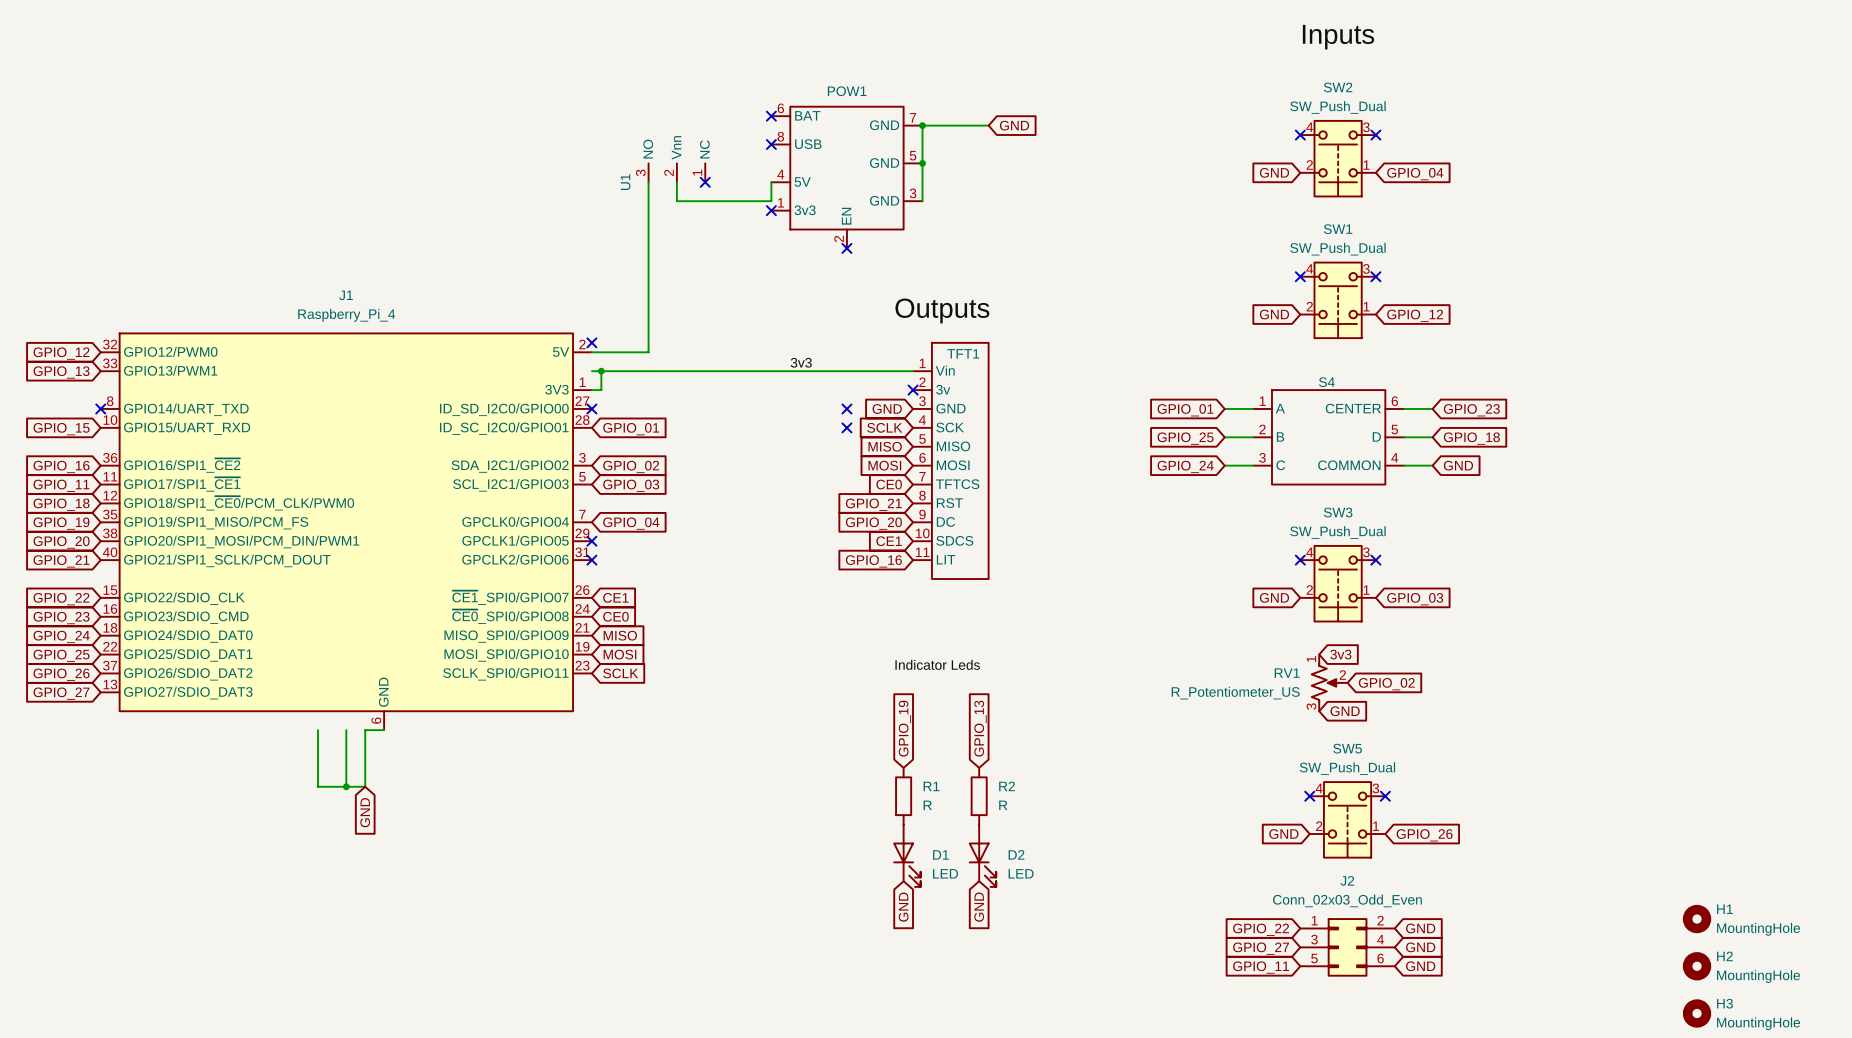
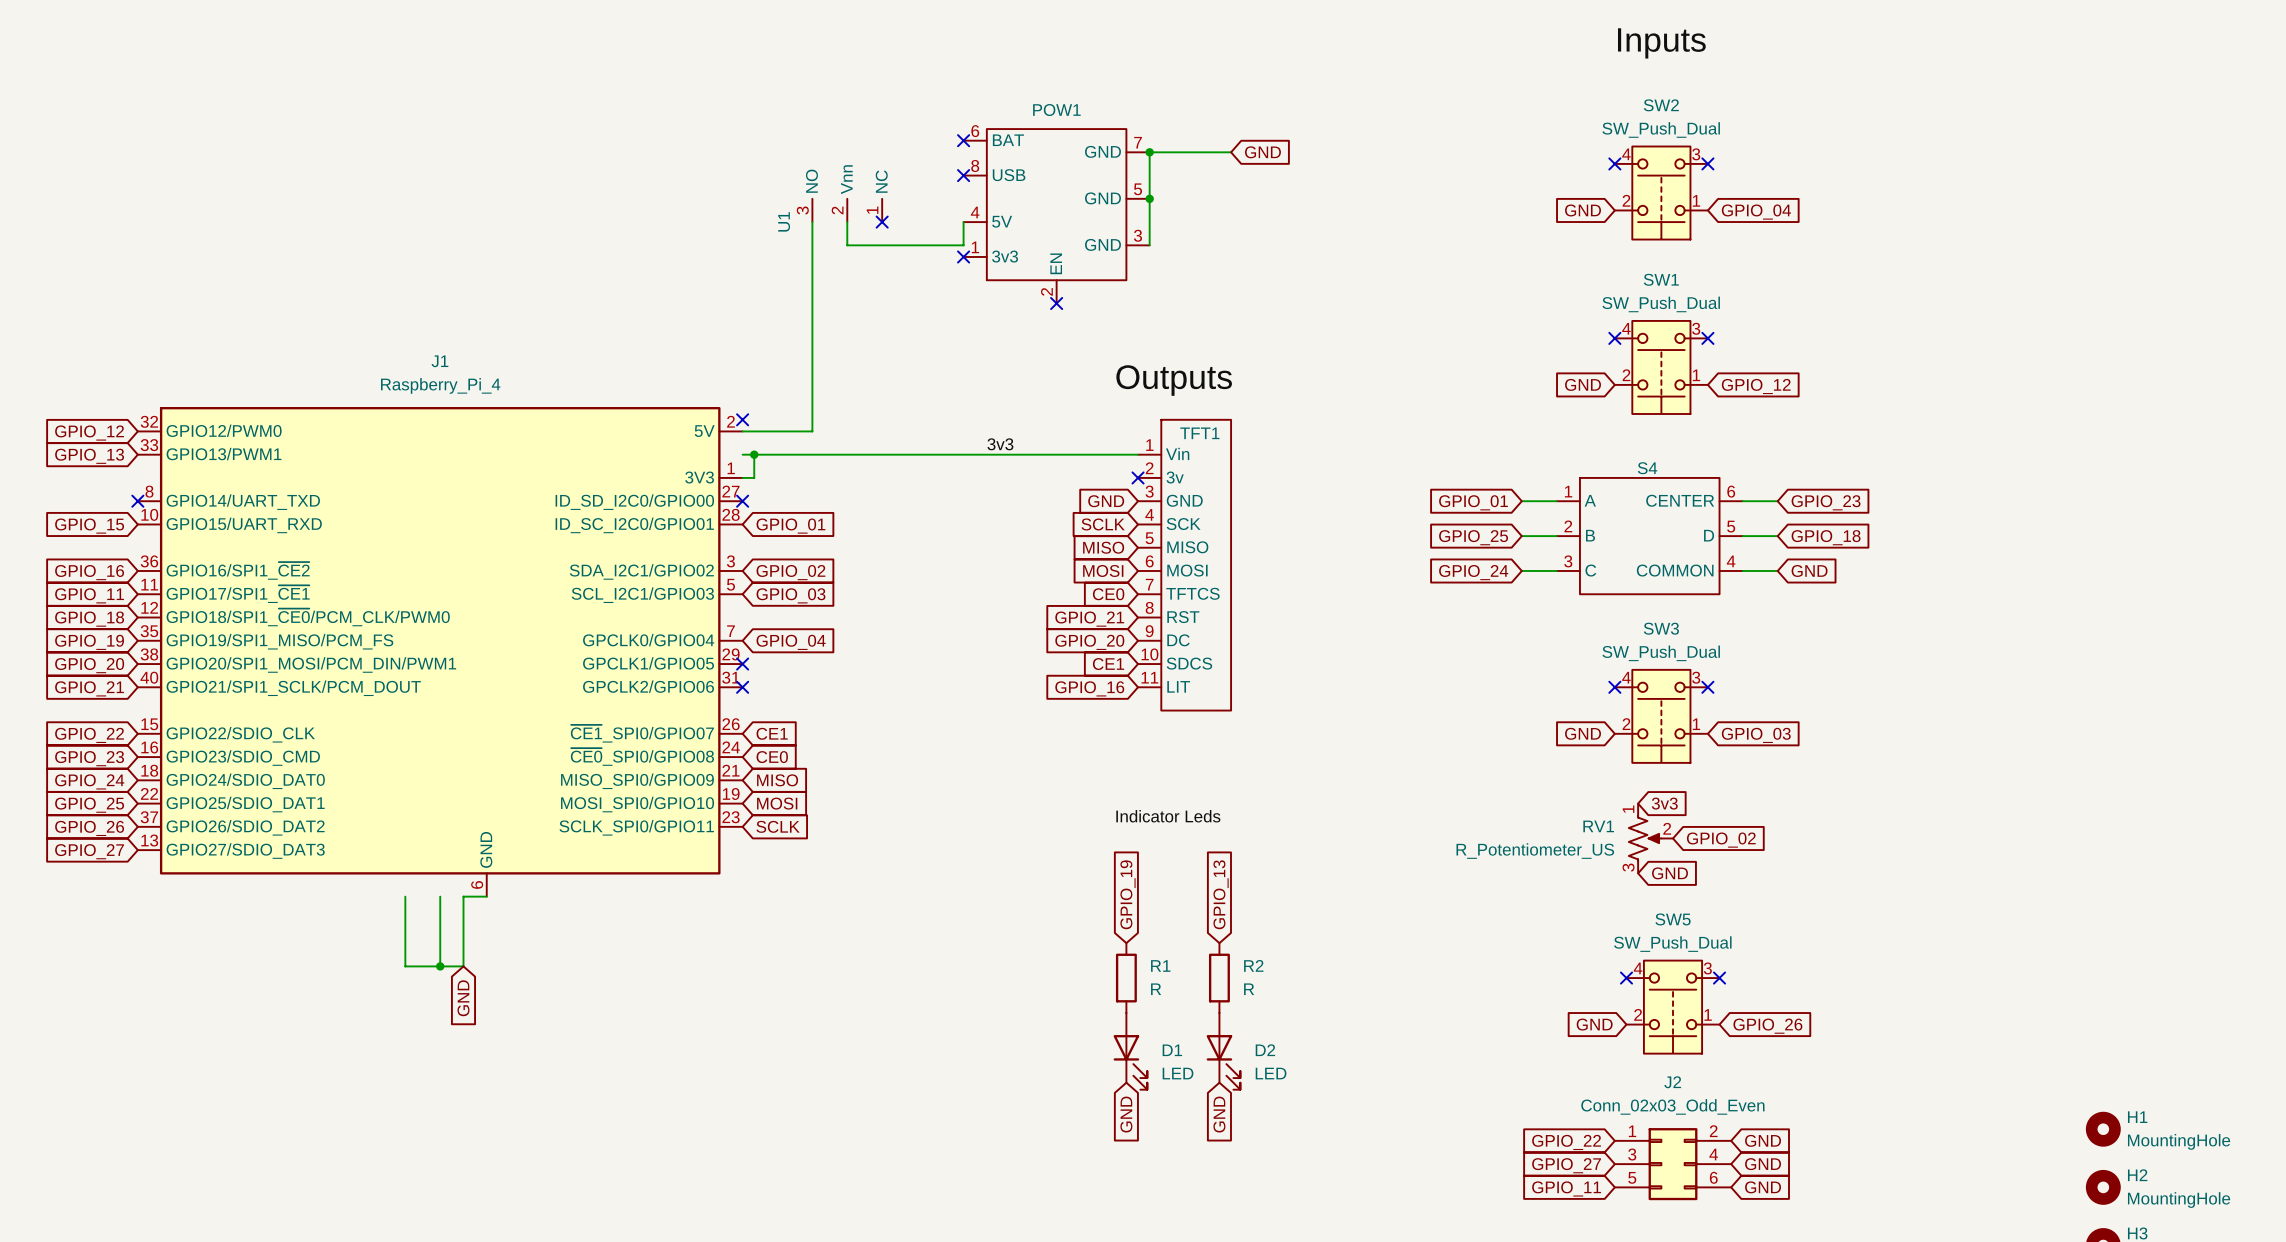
no-connect mark: (846, 408) -> none
no-connect mark: (846, 427) -> none

